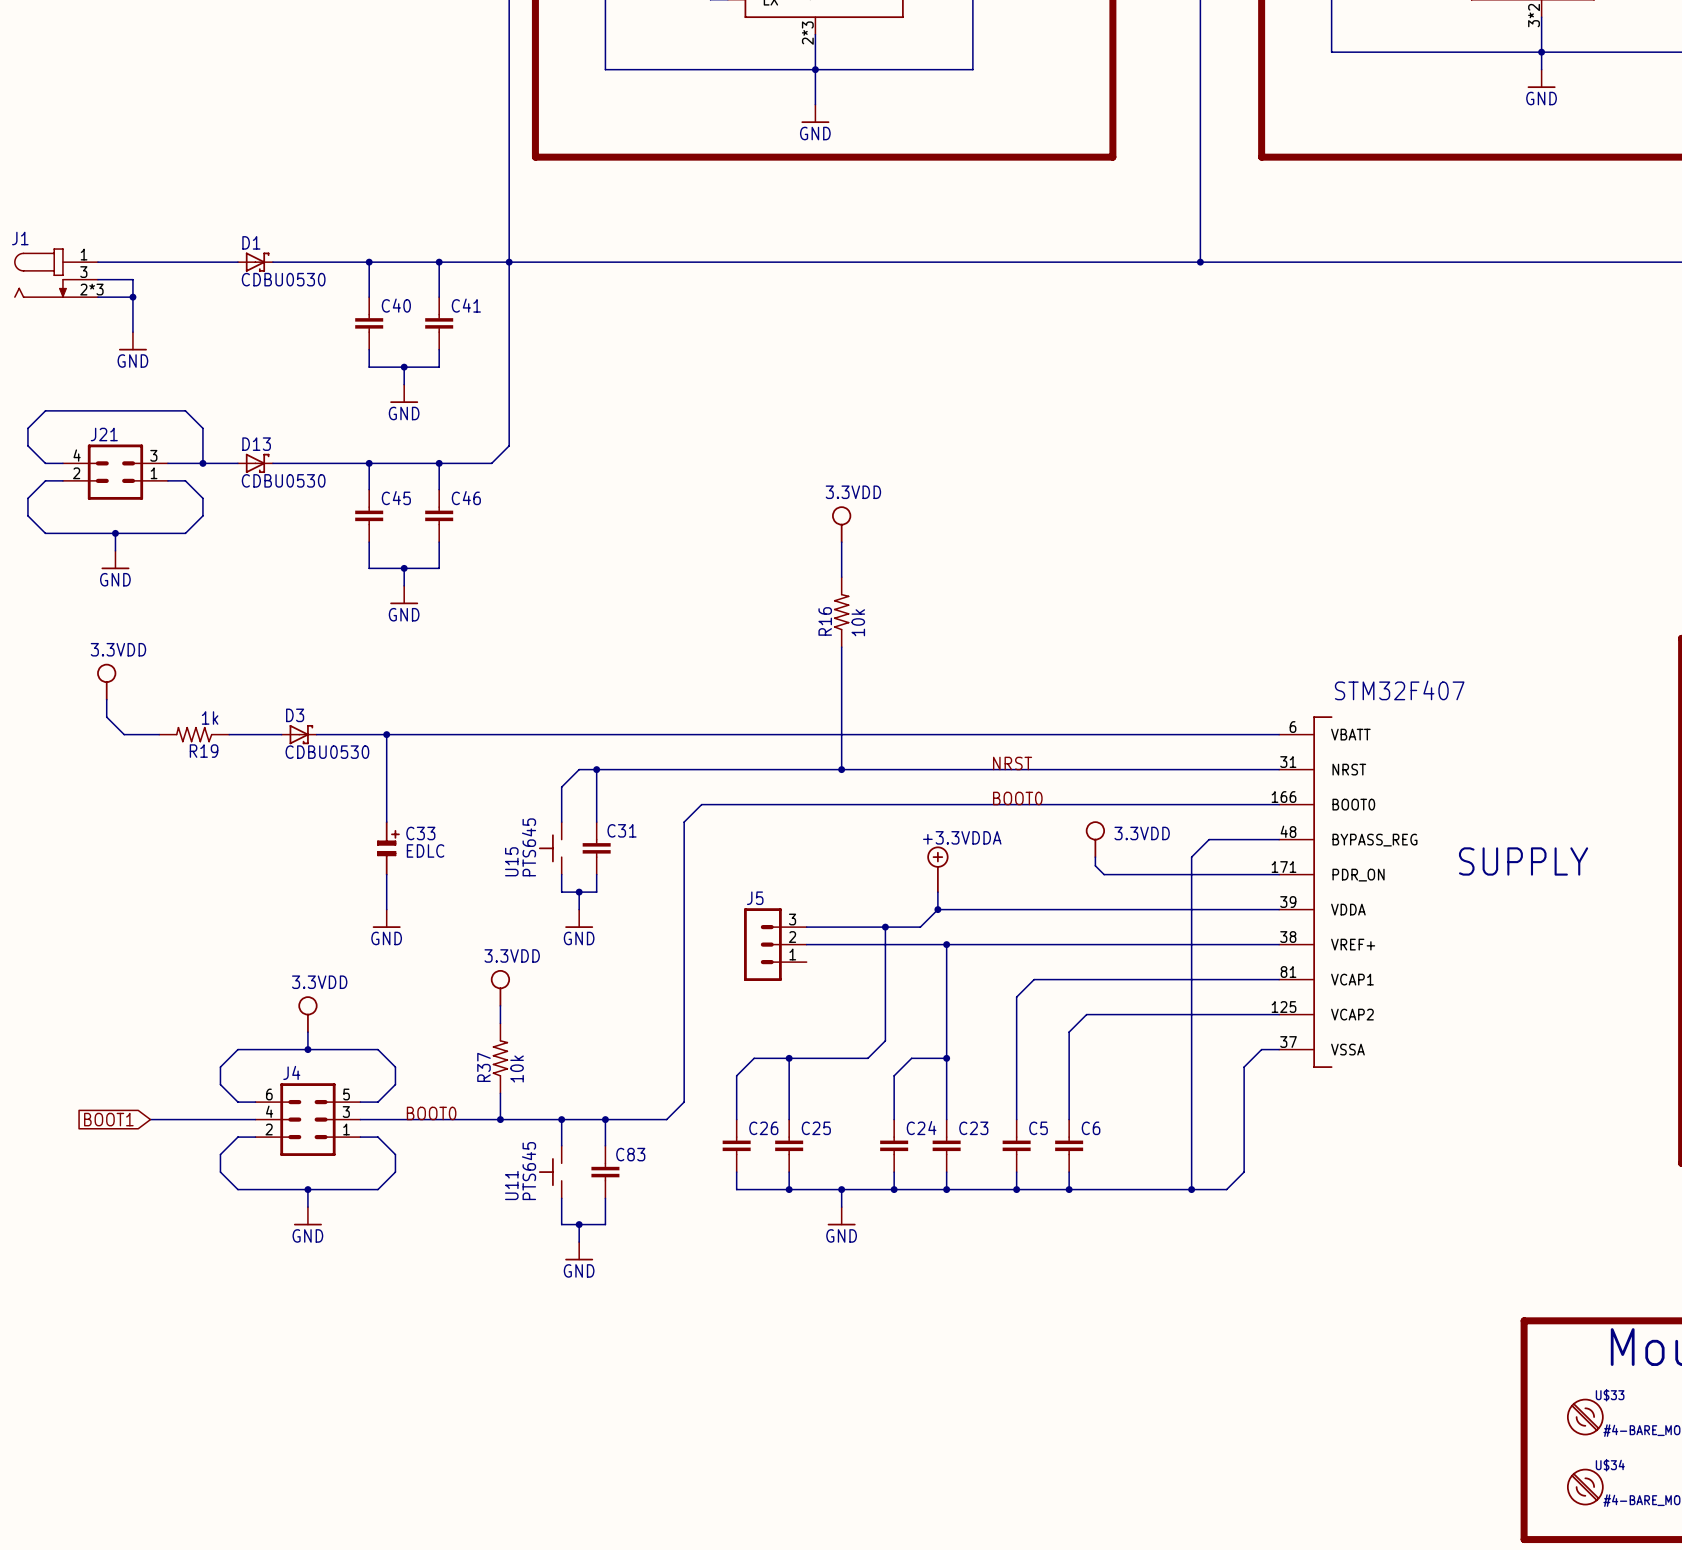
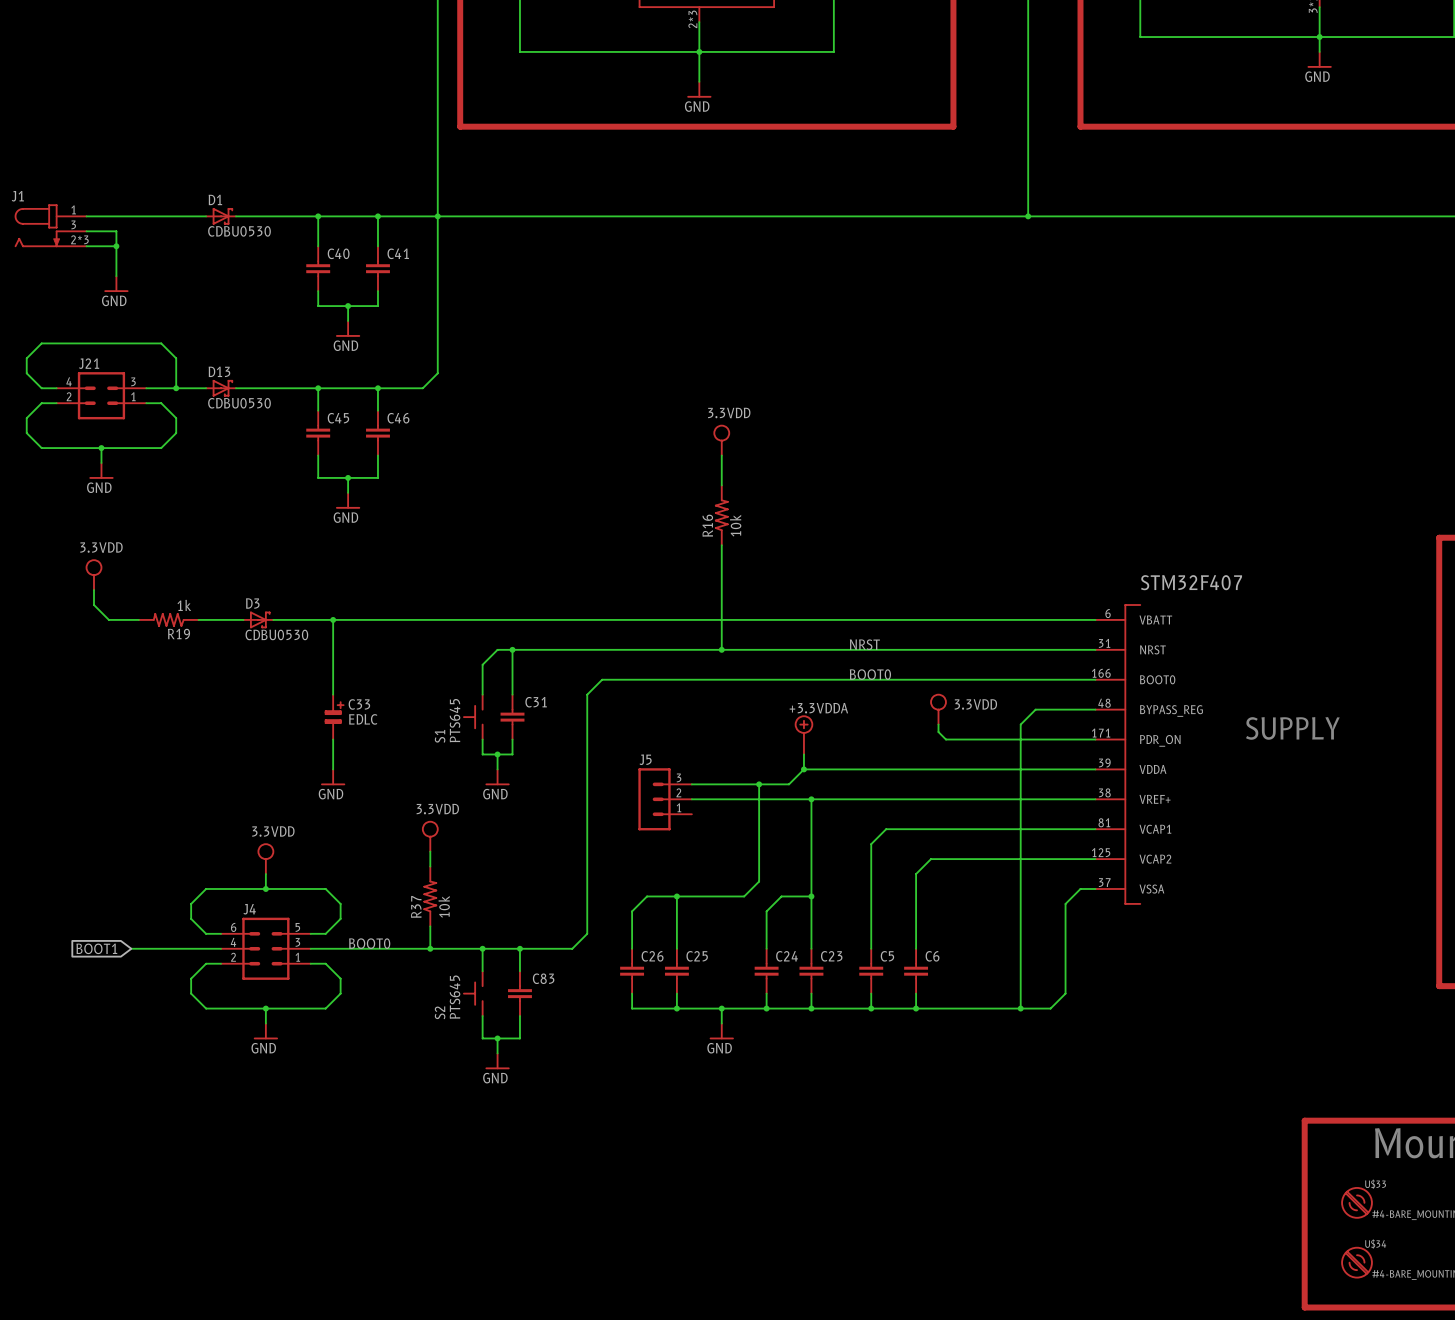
U15 name: U15 (511, 861) -> S1 (440, 736)
U11 name: U11 (511, 1185) -> S2 (440, 1012)

